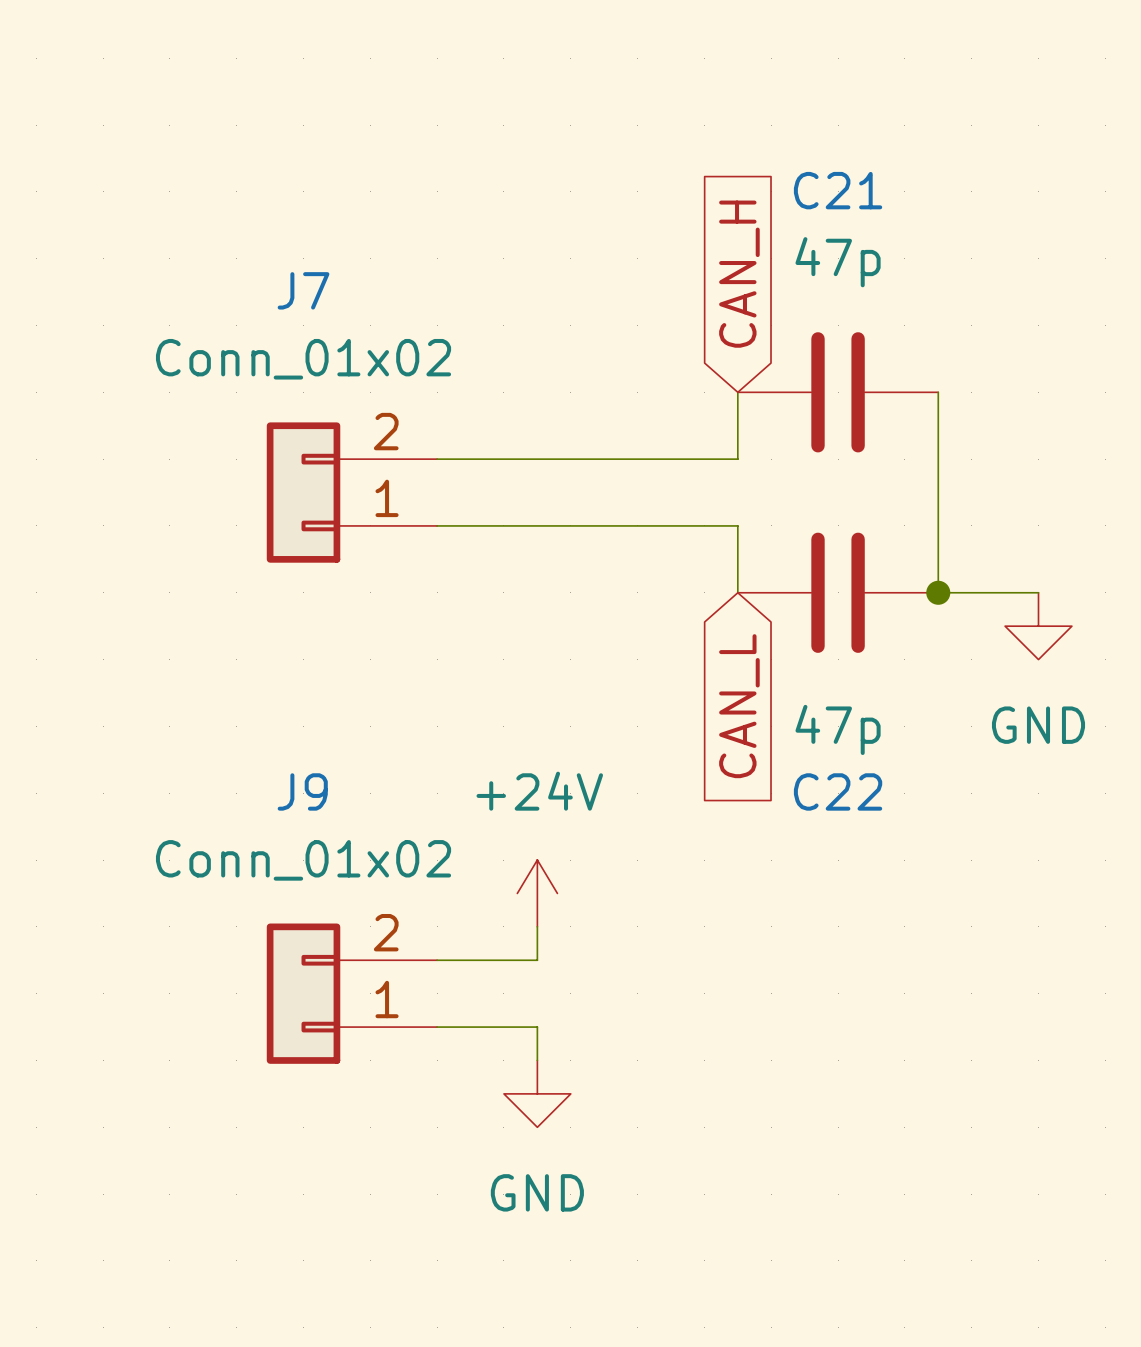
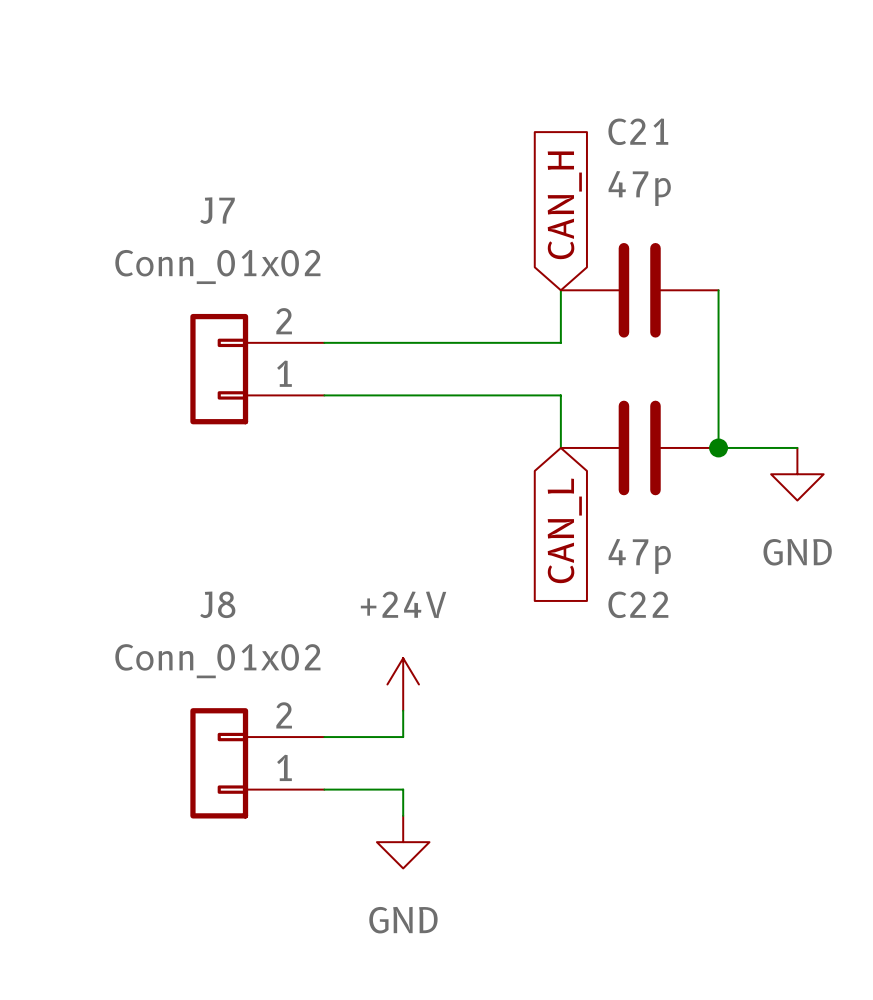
J9 name: J9 (302, 791) -> J8 (217, 604)

